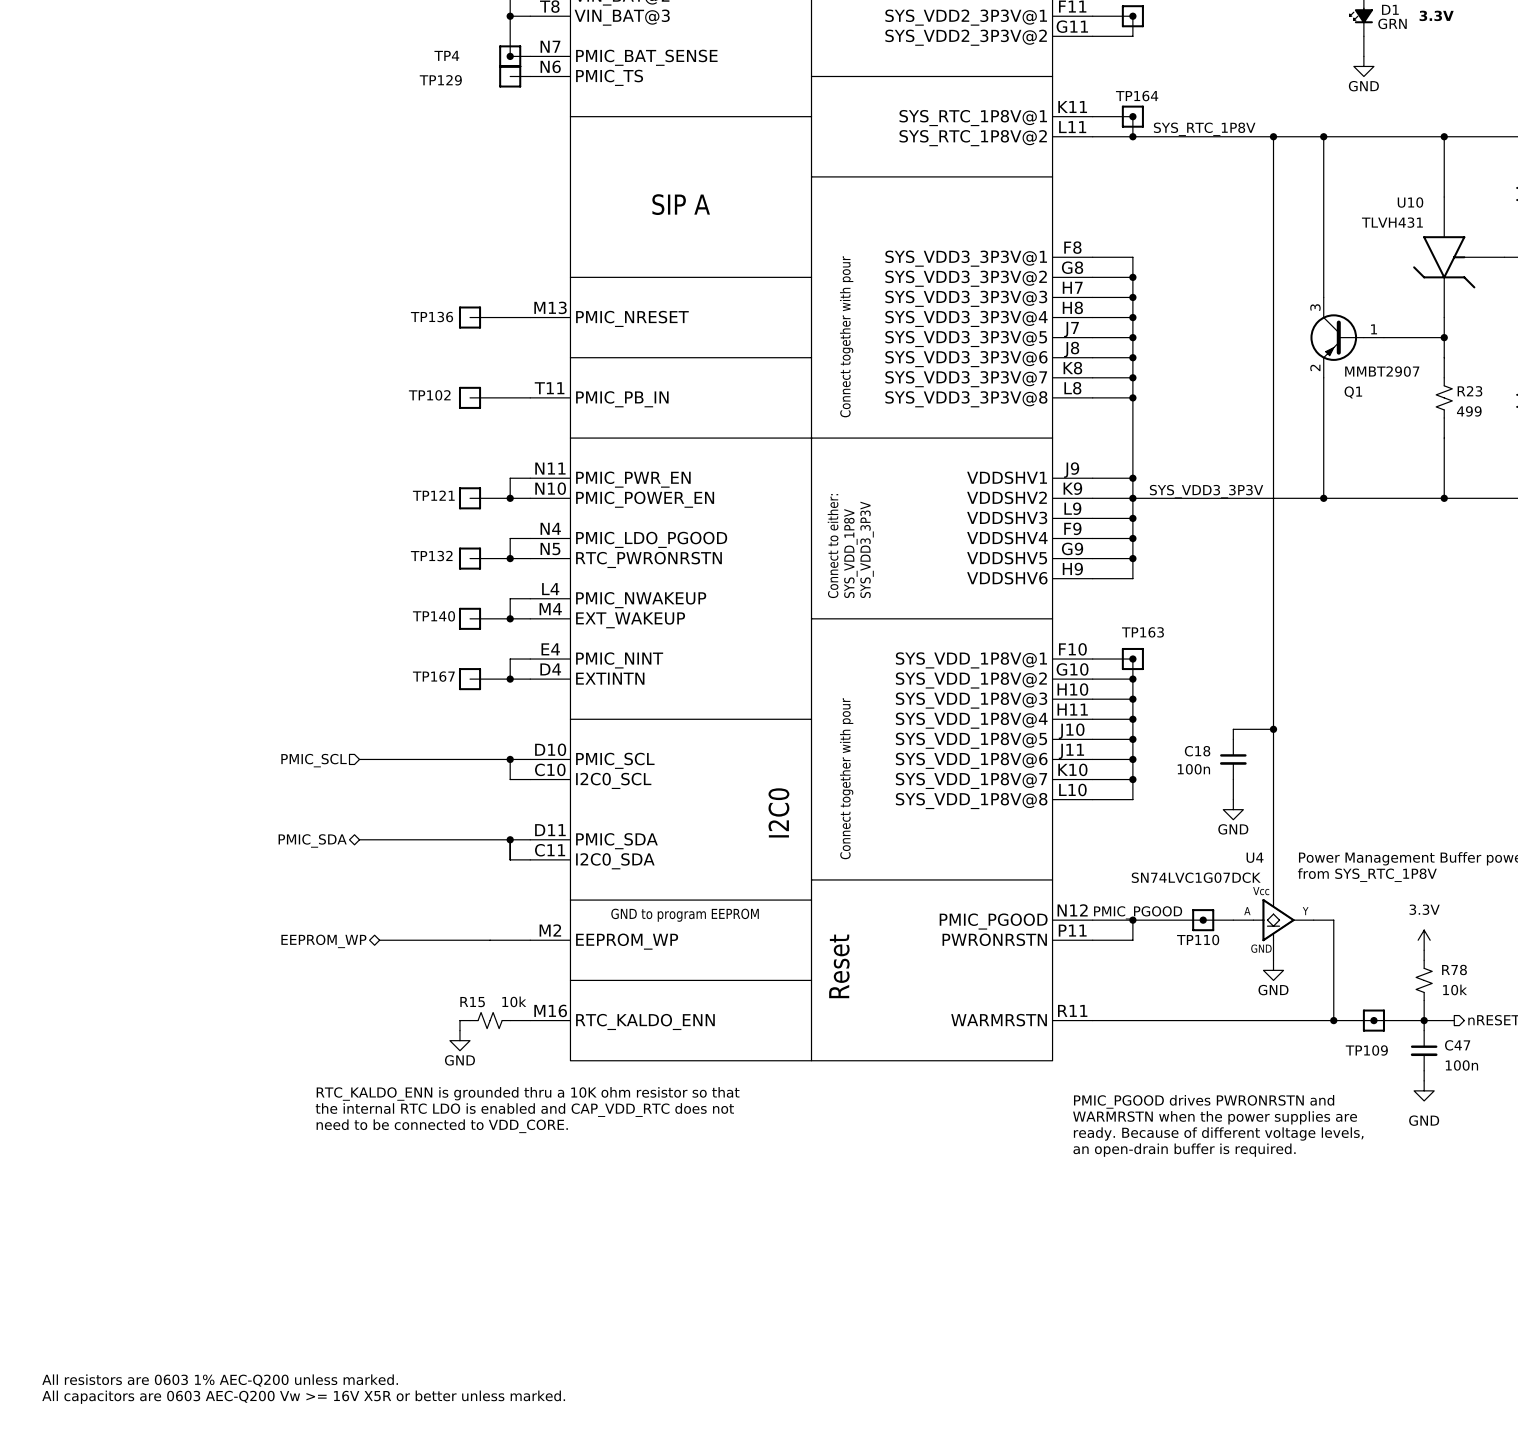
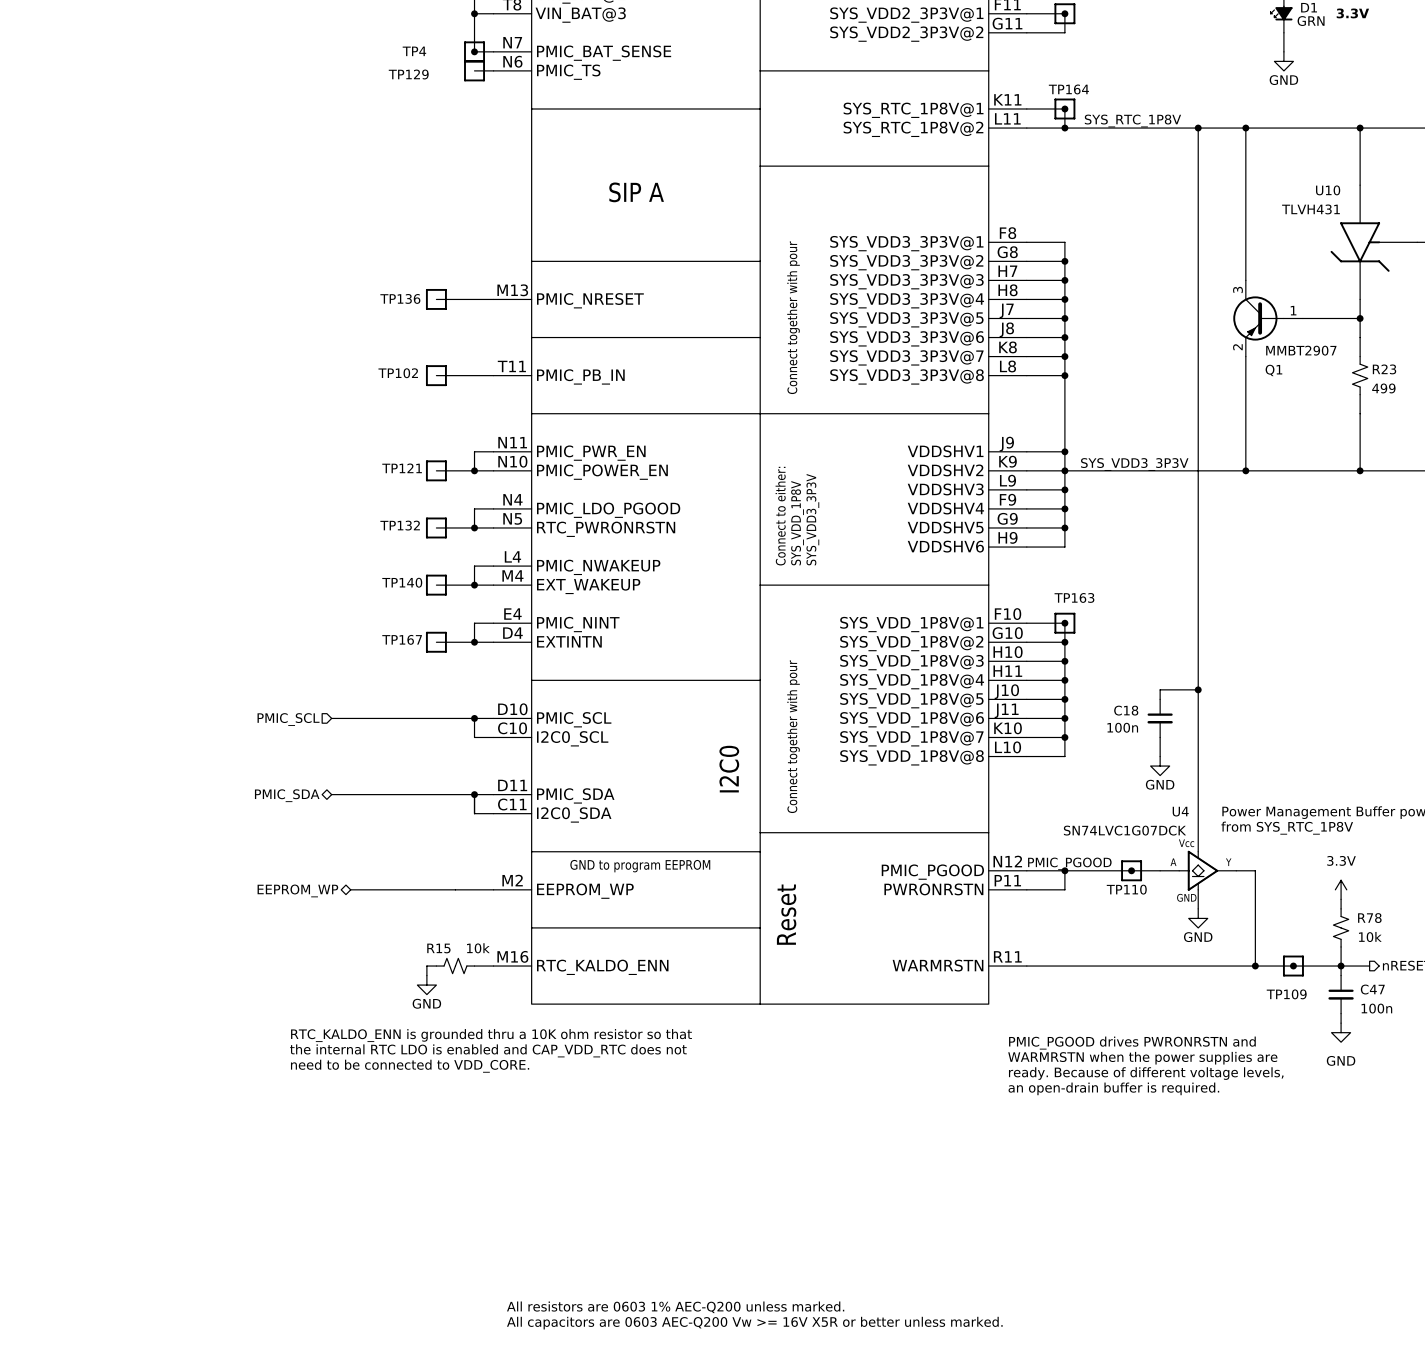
text: All resistors are 0603 1% AEC-Q200 unless marked. (220, 1380) -> none
text: none -> All resistors are 0603 1% AEC-Q200 unless marked. (675, 1307)
text: All capacitors are 0603 AEC-Q200 Vw >= 16V X5R or better unless marked. (303, 1397) -> none
text: none -> All capacitors are 0603 AEC-Q200 Vw >= 16V X5R or better unless marked. (754, 1323)

